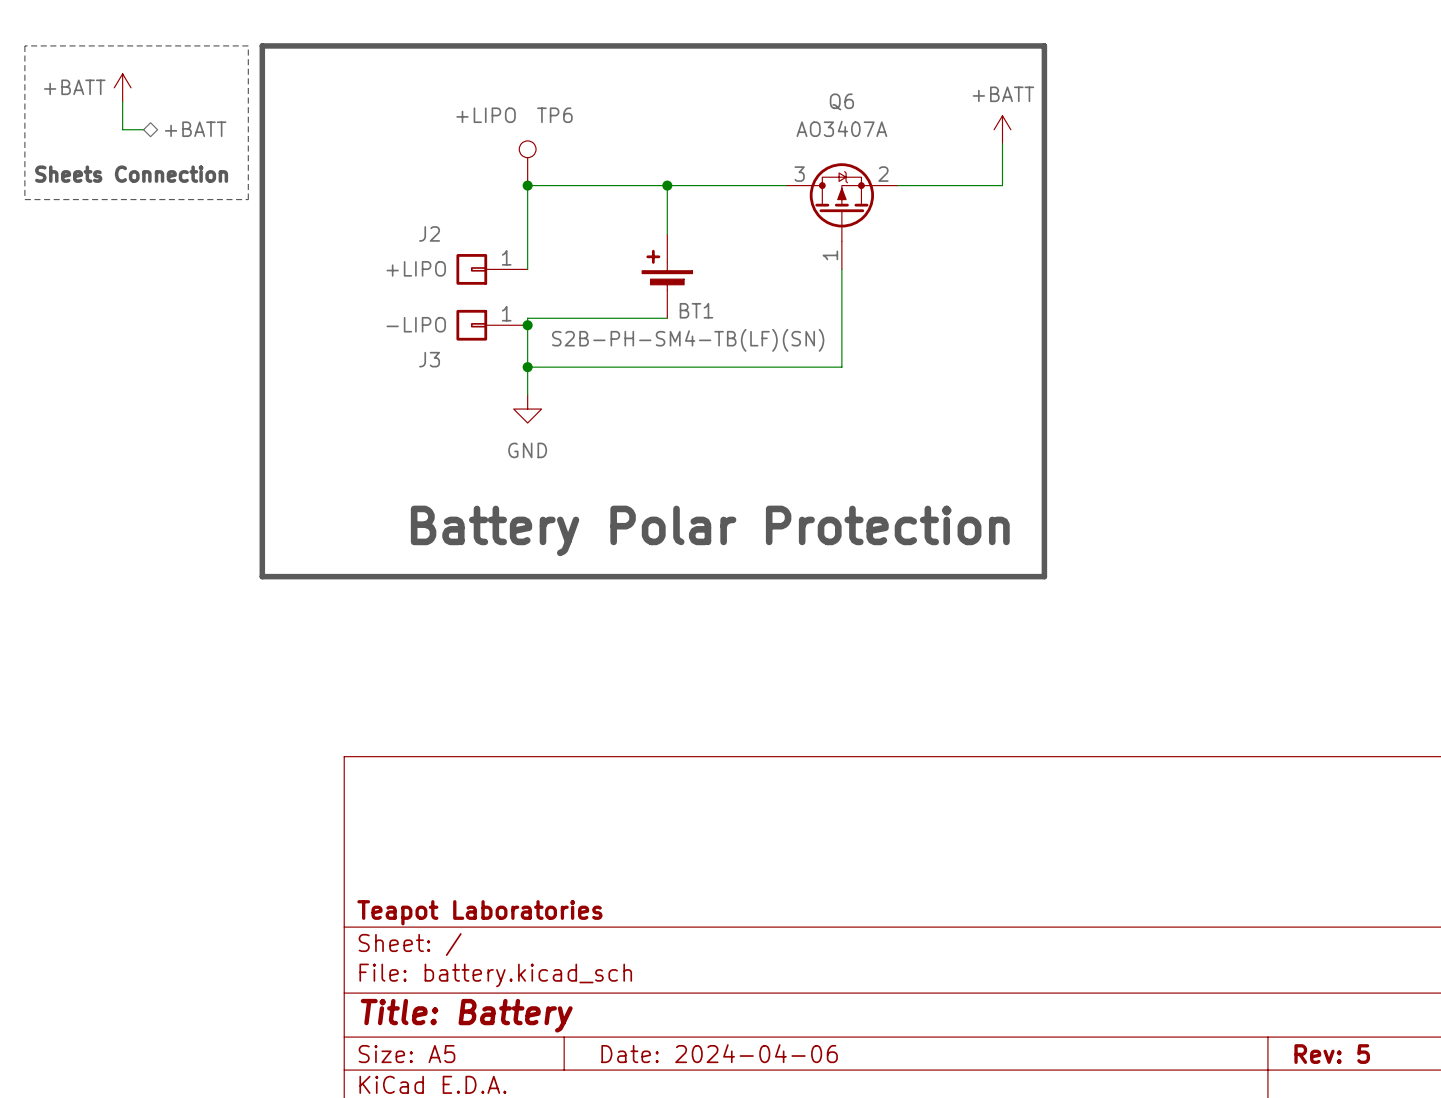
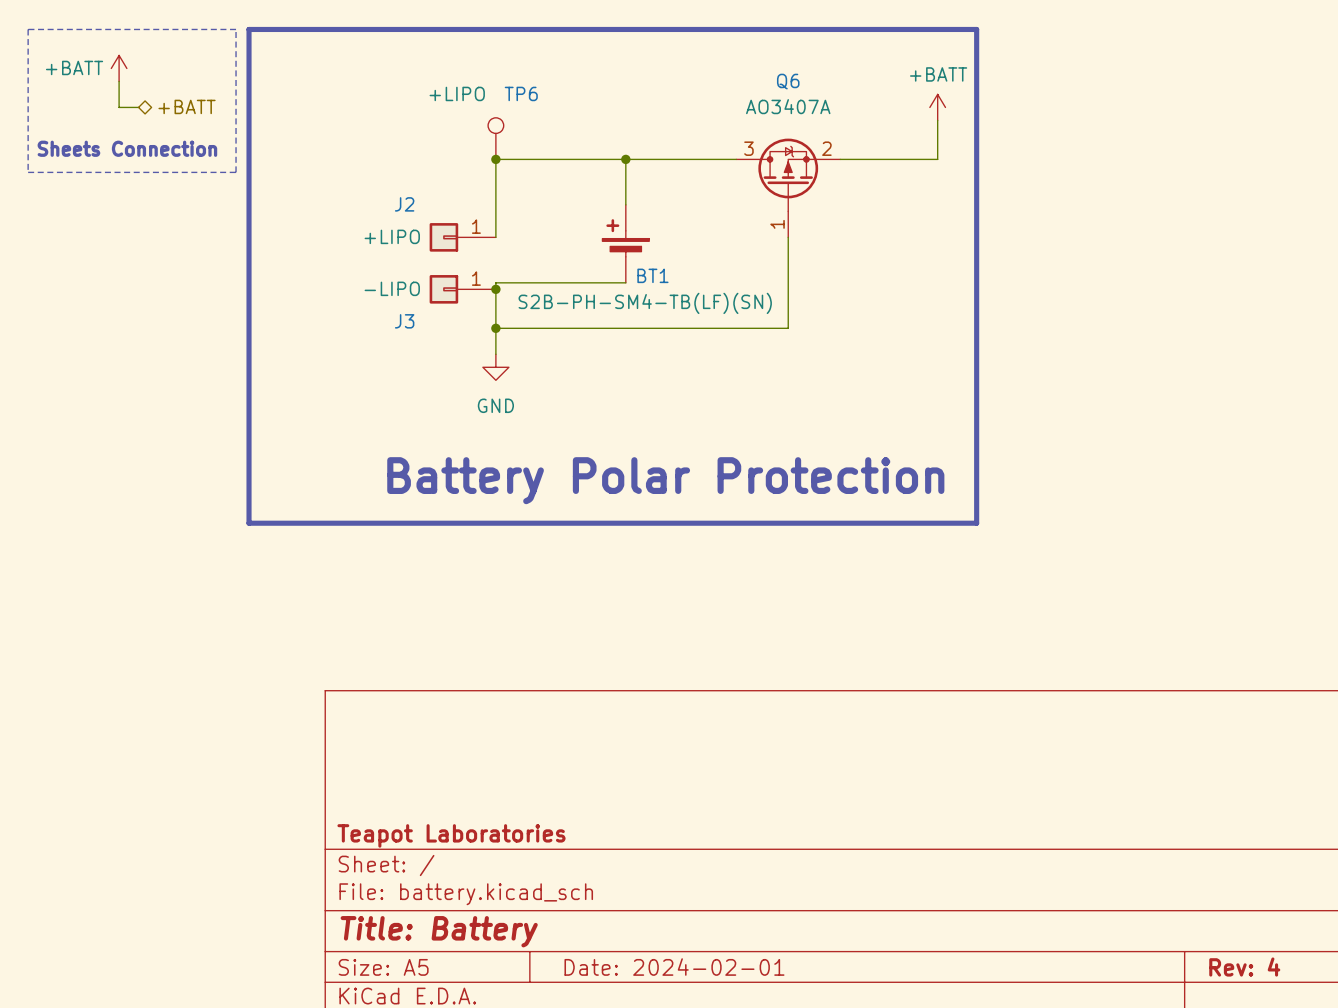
title block: Date: 2024-04-06 (719, 1053) -> Date: 2024-02-01 (674, 967)
title block: Rev: 5 (1332, 1054) -> Rev: 4 (1244, 967)

